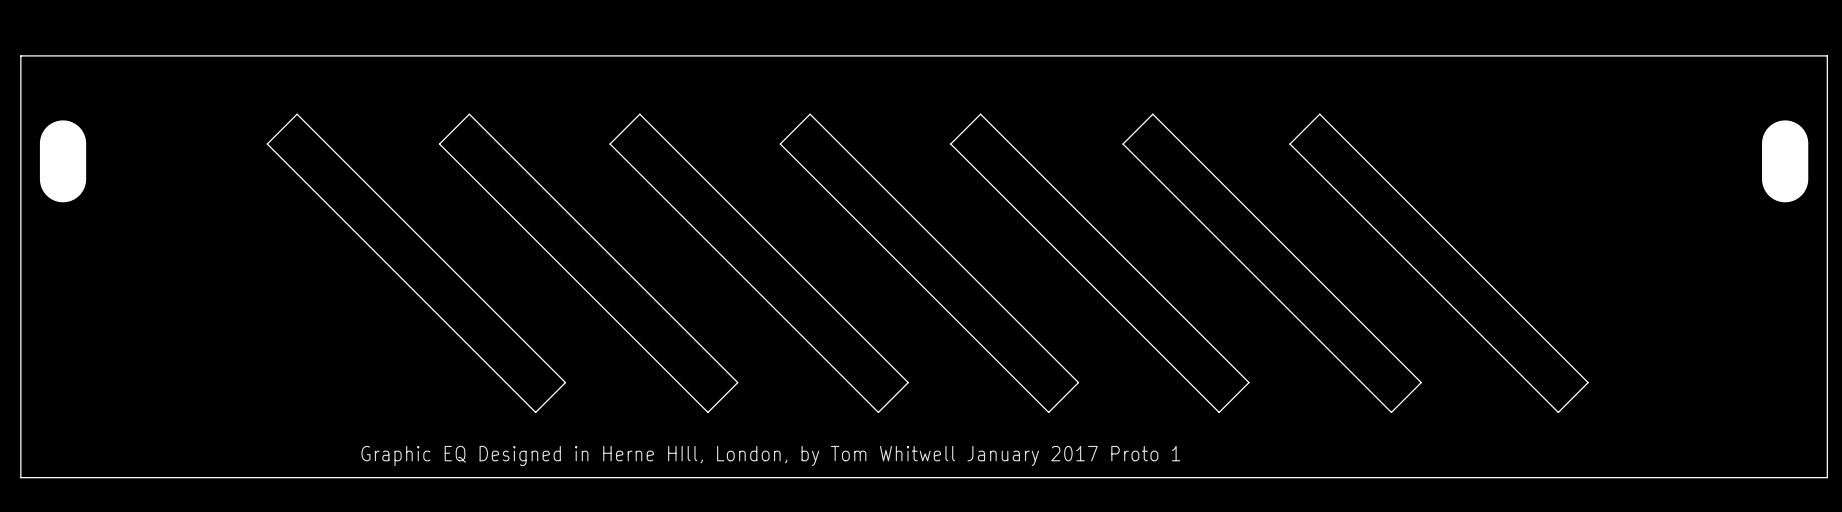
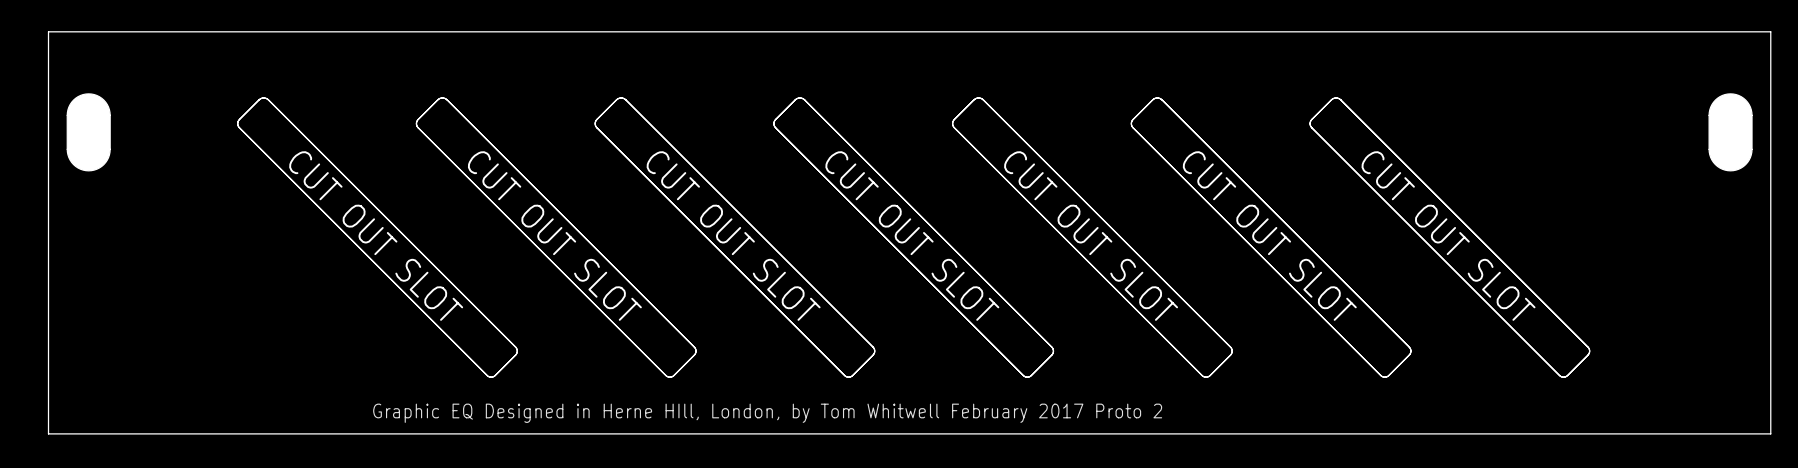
board edge: (297, 114) (565, 382) (535, 412) (267, 144) (297, 114) -> none
board edge: (469, 114) (737, 382) (707, 412) (439, 144) (469, 114) -> none
board edge: (639, 114) (908, 382) (878, 412) (610, 144) (639, 114) -> none
board edge: (810, 114) (1078, 382) (1048, 412) (780, 144) (810, 114) -> none
board edge: (980, 114) (1248, 382) (1219, 412) (950, 144) (980, 114) -> none
board edge: (1152, 114) (1421, 382) (1391, 412) (1123, 144) (1152, 114) -> none
board edge: (1319, 114) (1588, 382) (1558, 412) (1289, 144) (1319, 114) -> none
drawing: none -> [237, 97, 1590, 378]
text: Graphic EQ Designed in Herne HIll, London, by Tom Whitwell January 2017 Proto 1 (770, 455) -> Graphic EQ Designed in Herne HIll, London, by Tom Whitwell February 2017 Proto 2 (767, 413)

